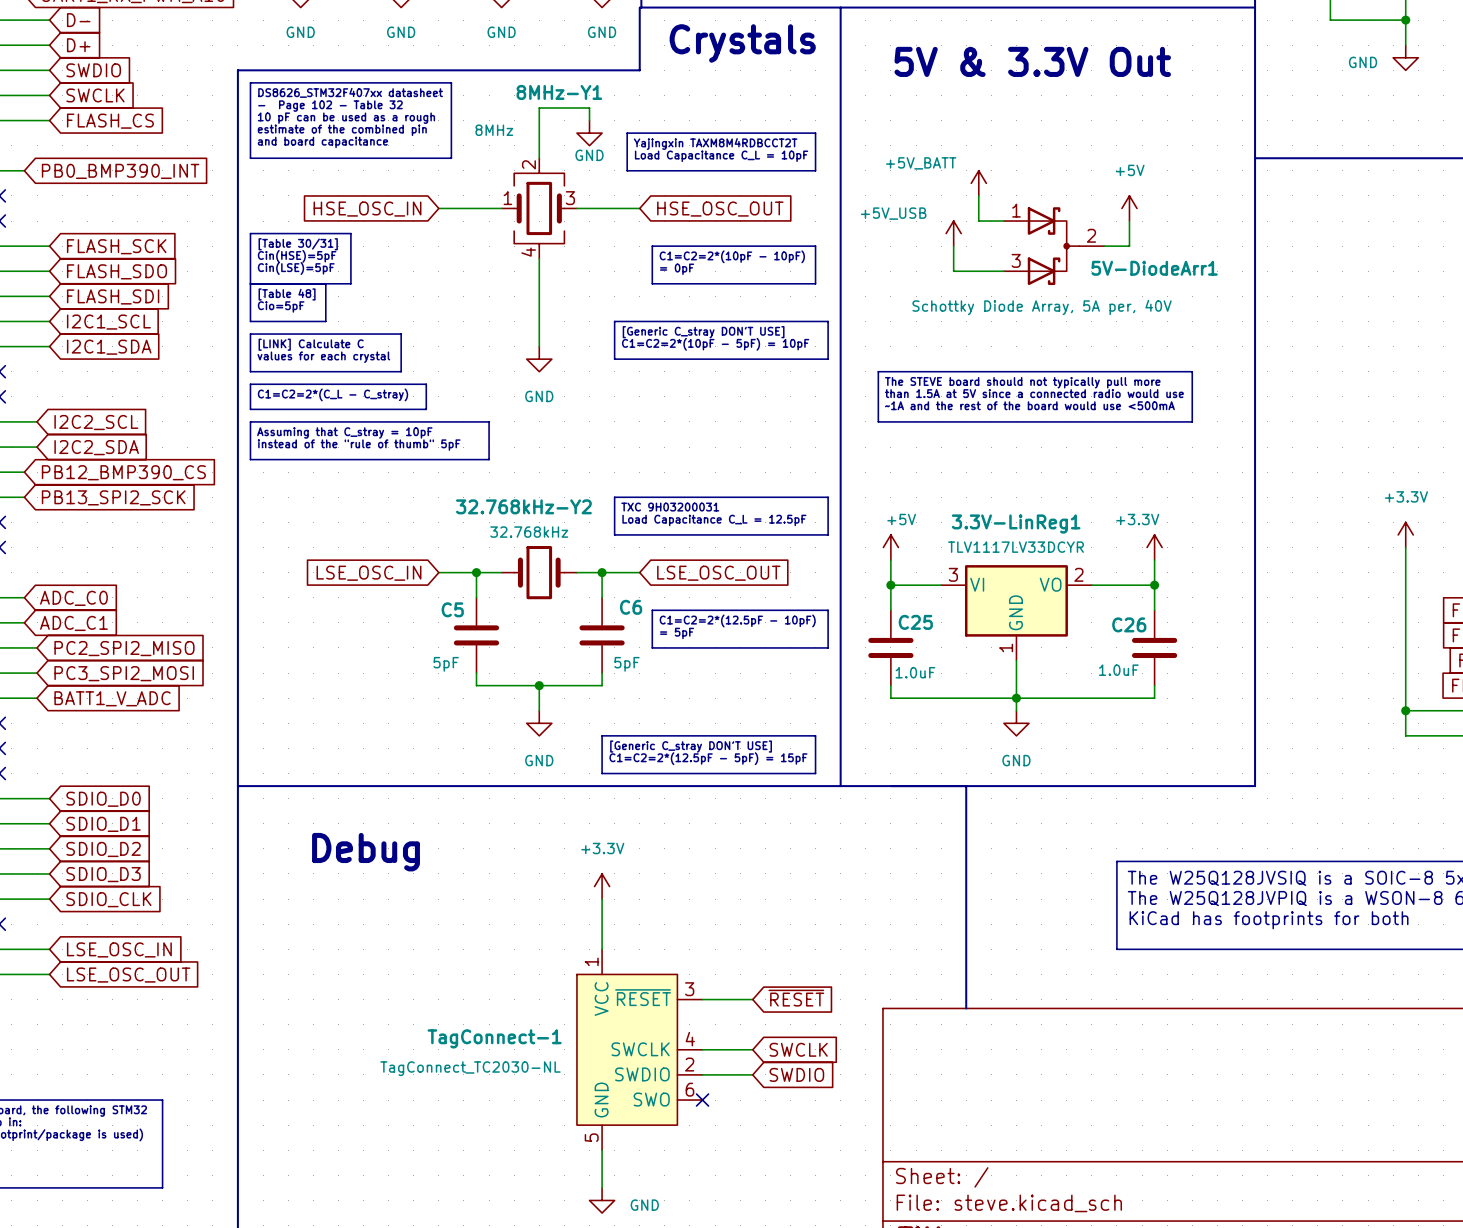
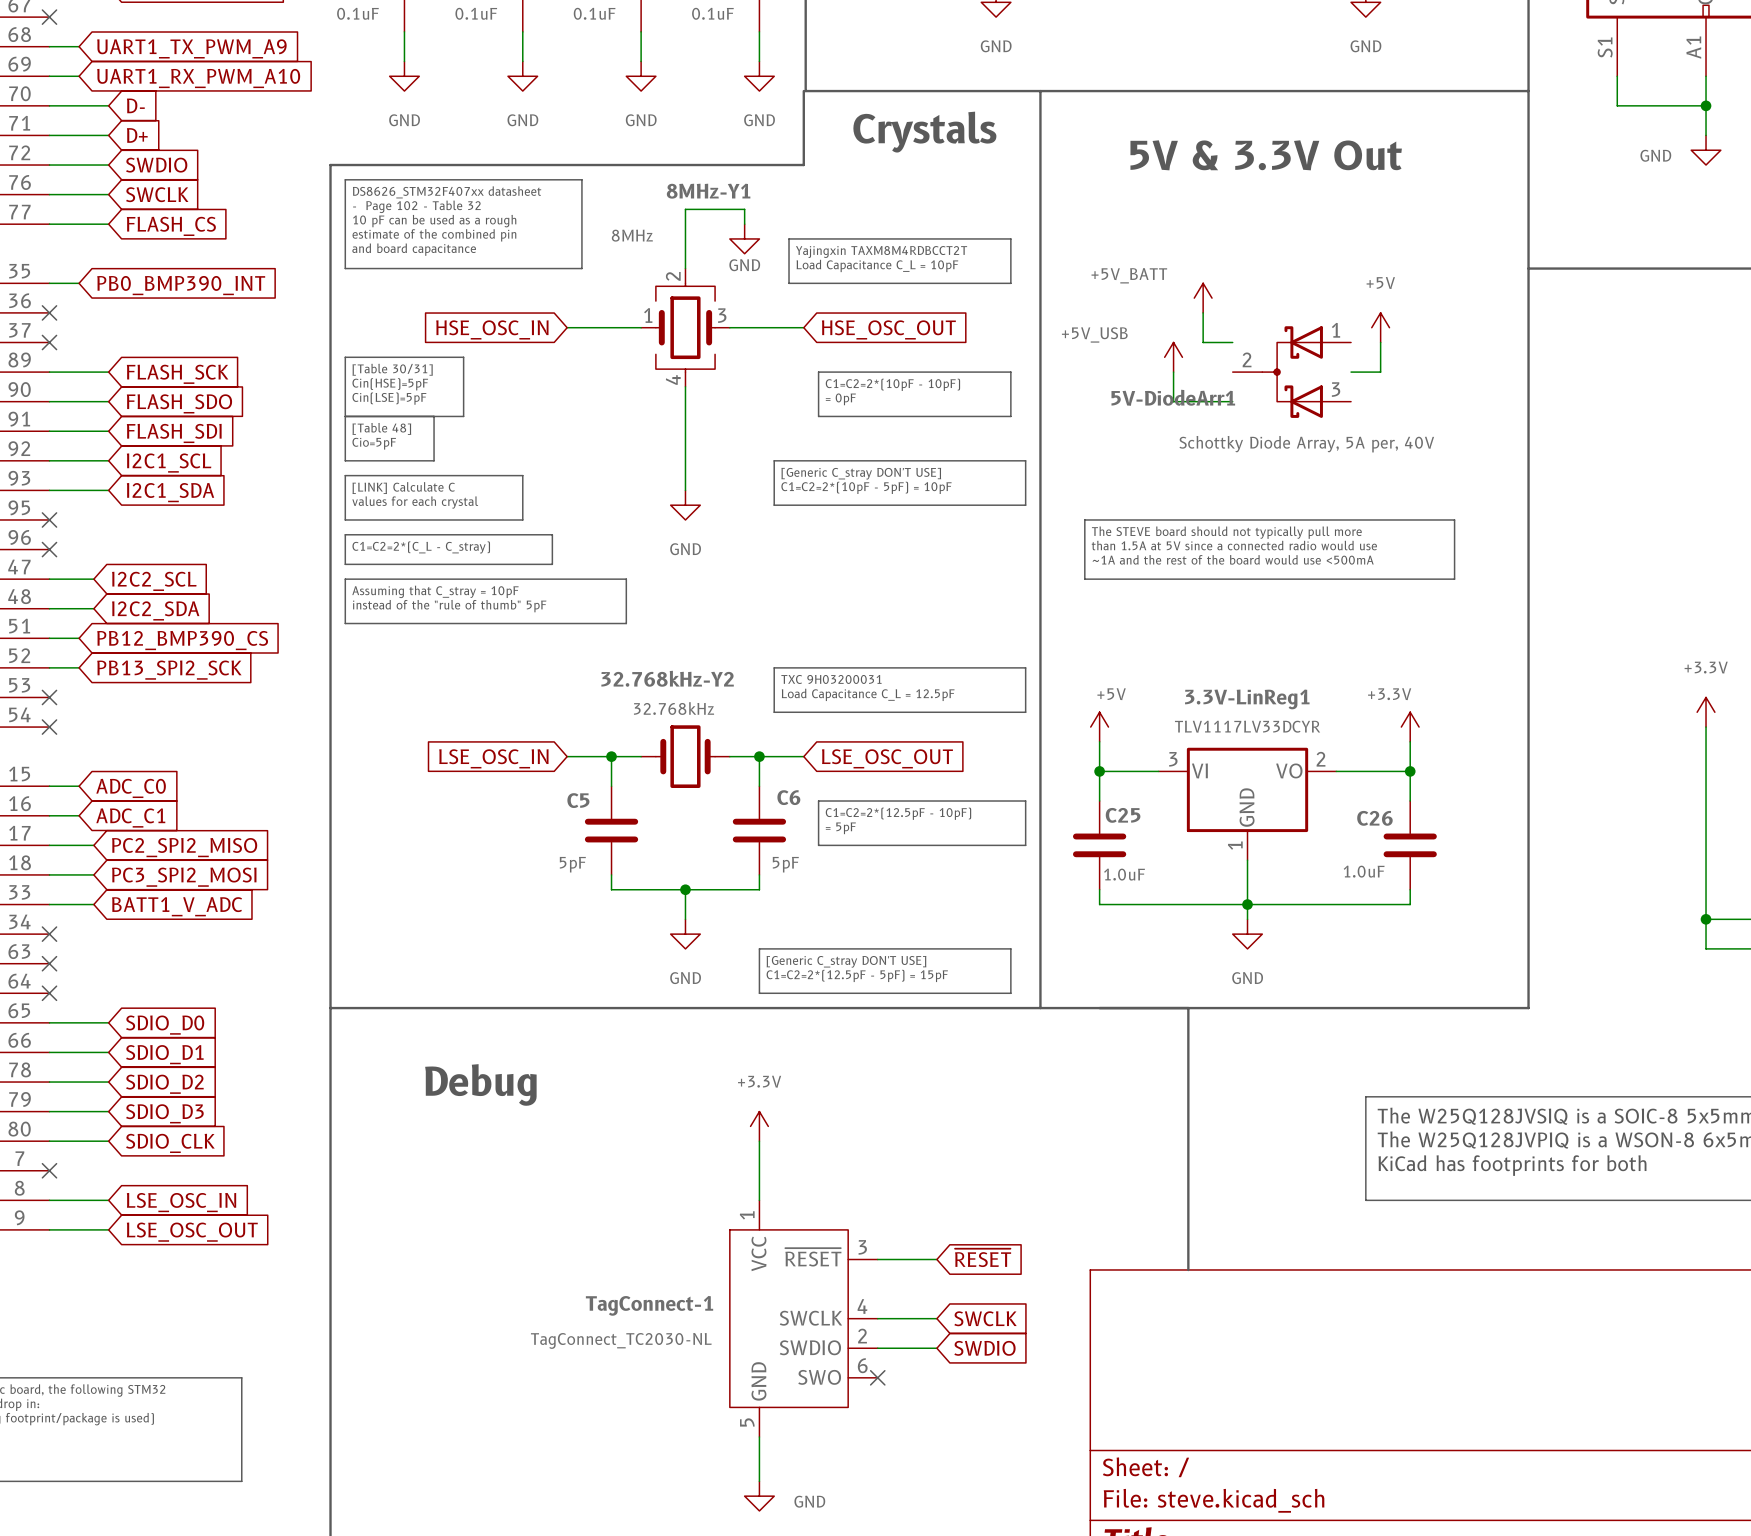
5V-DiodeArr1 flip: as is (1053, 246) -> left-right (1292, 372)

